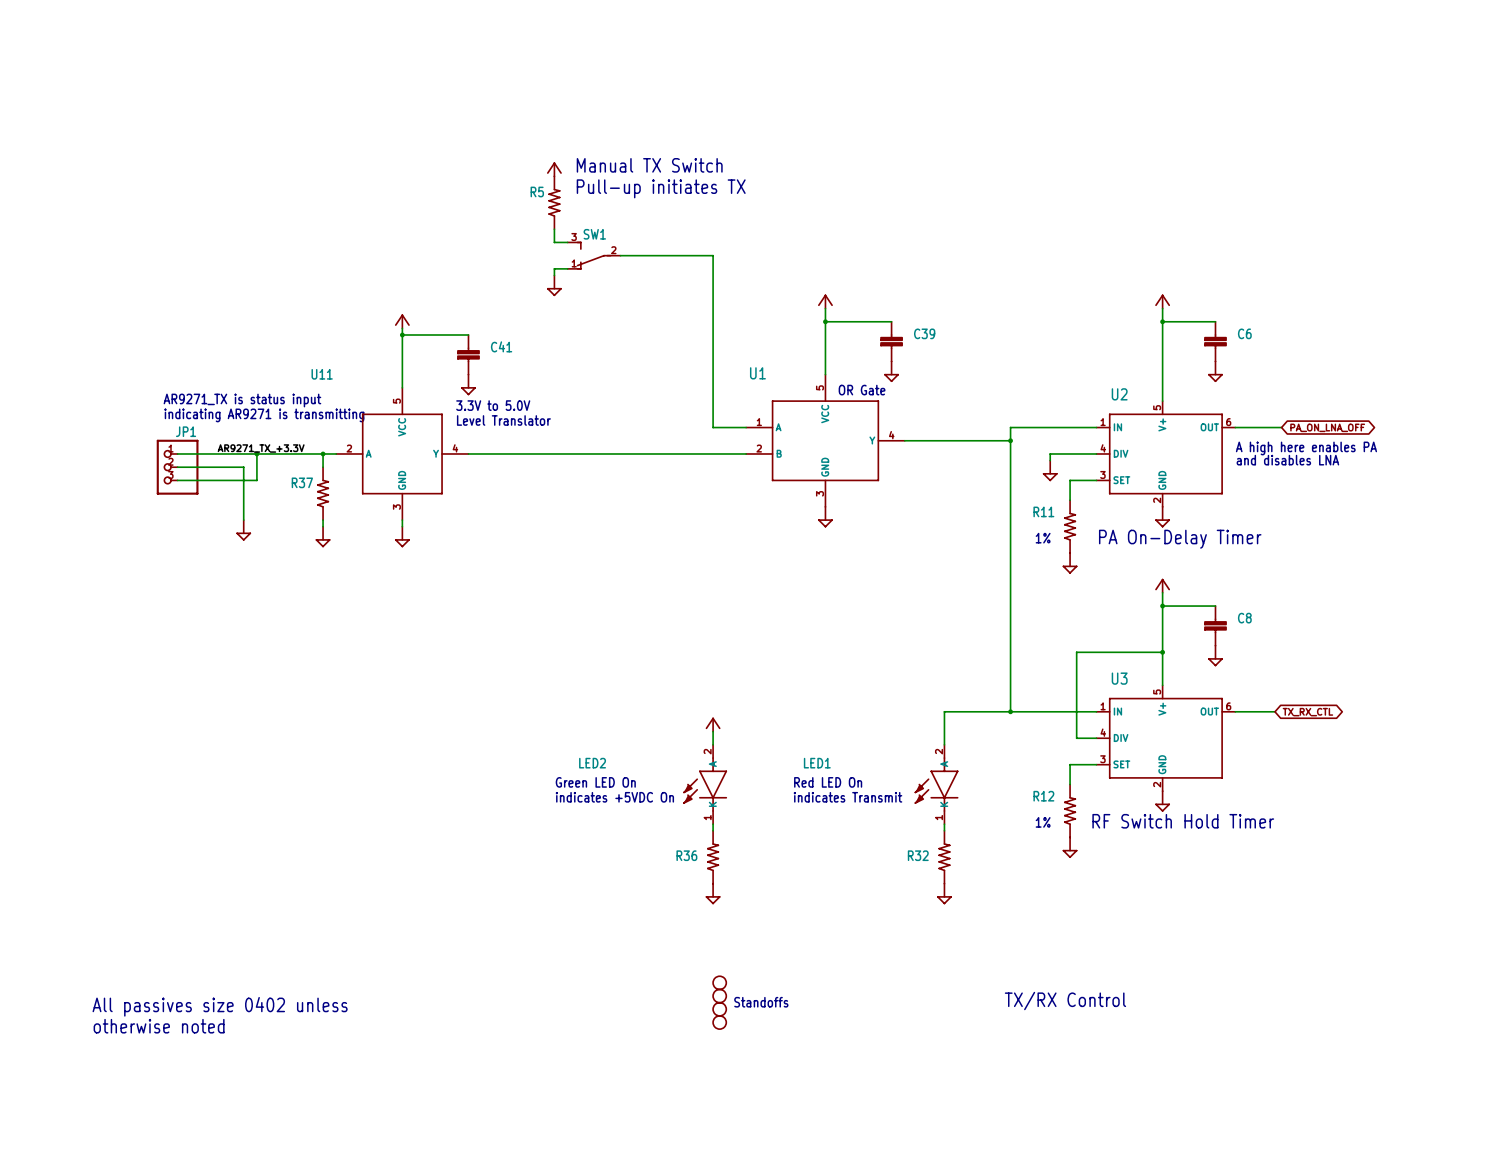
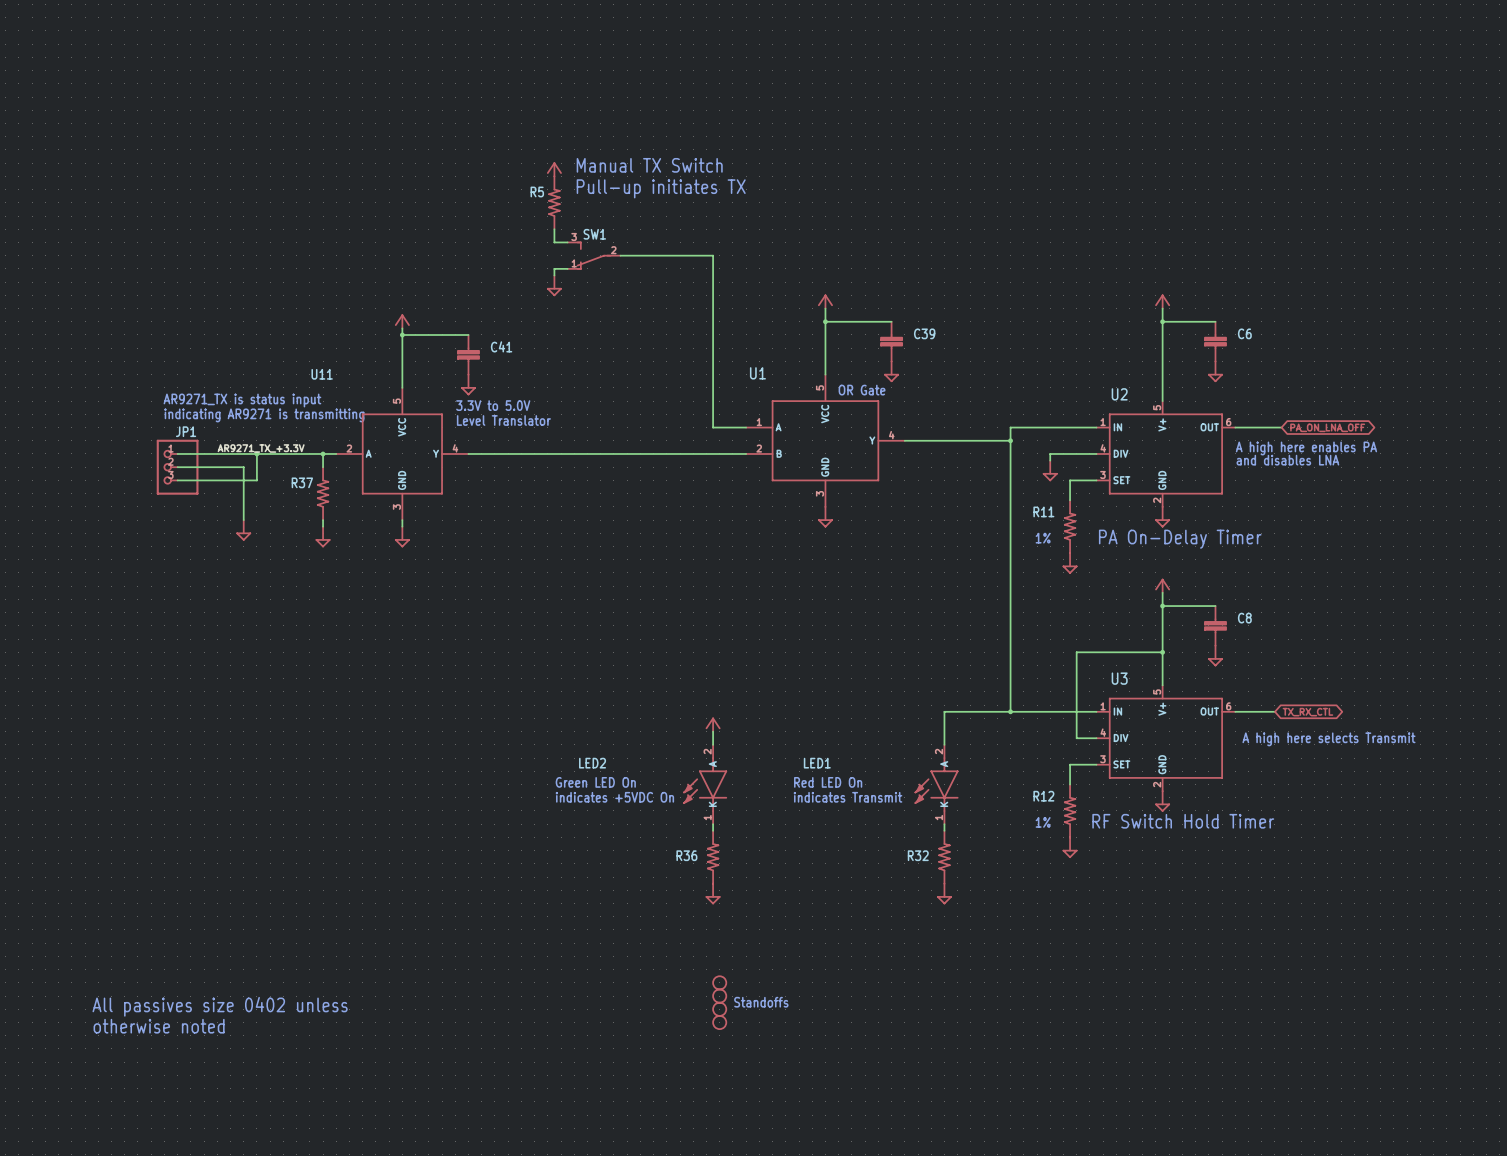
text: none -> A high here selects Transmit (1328, 739)
text: TX/RX Control (1065, 1001) -> none

